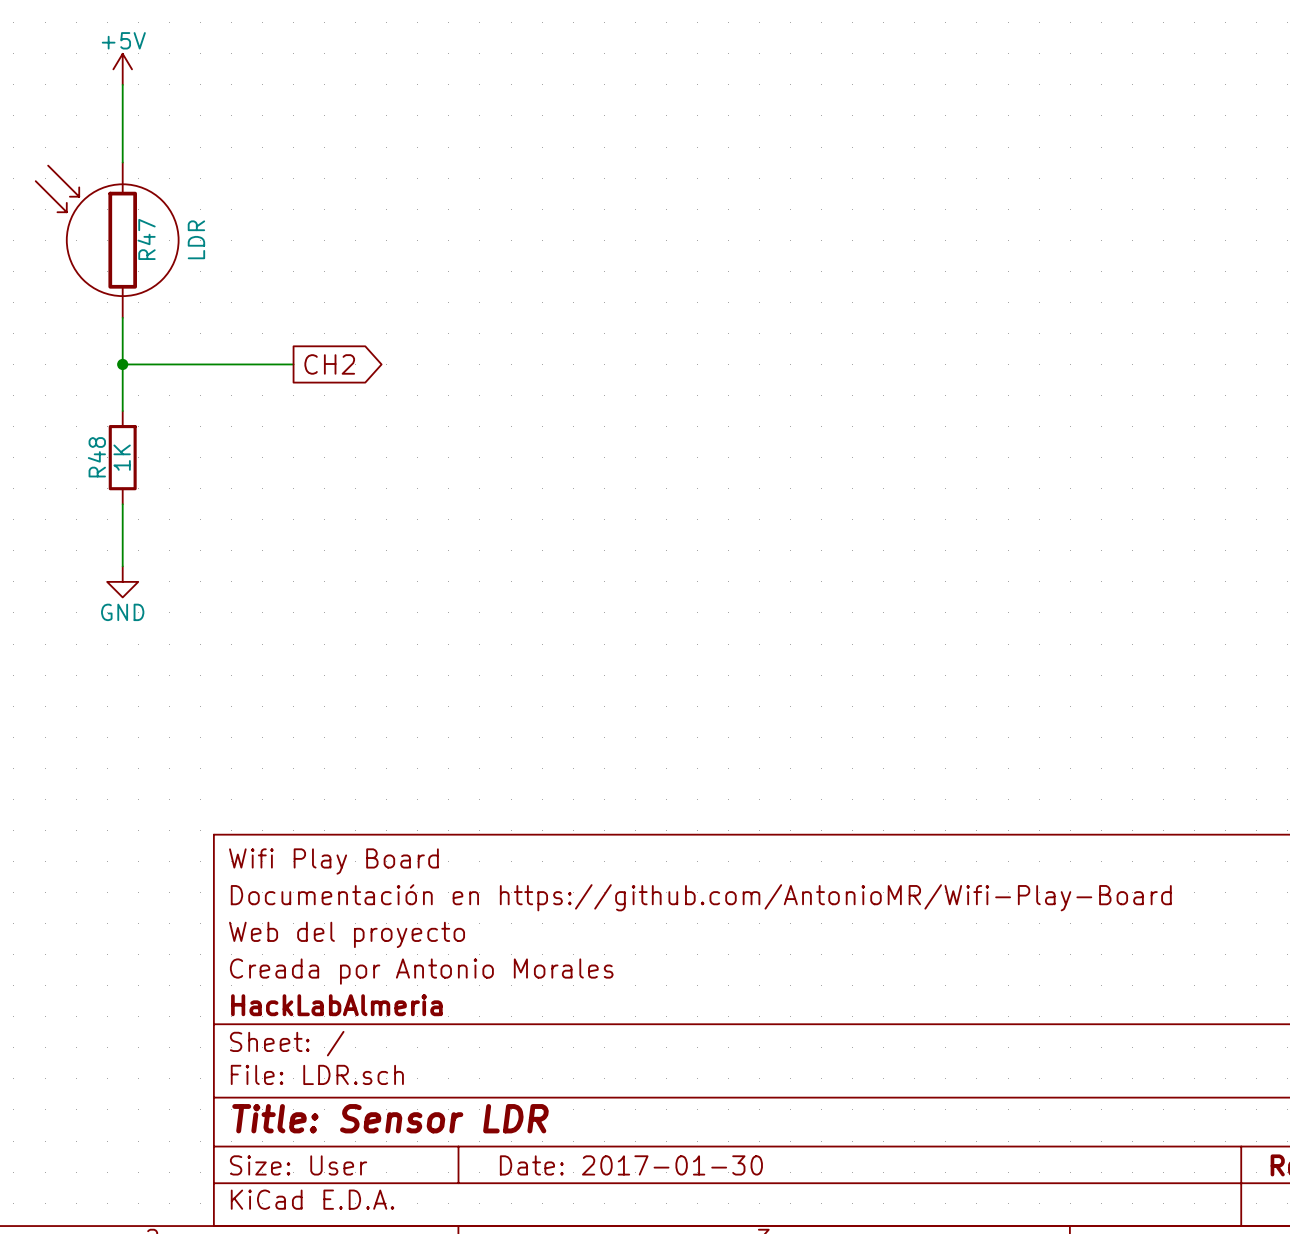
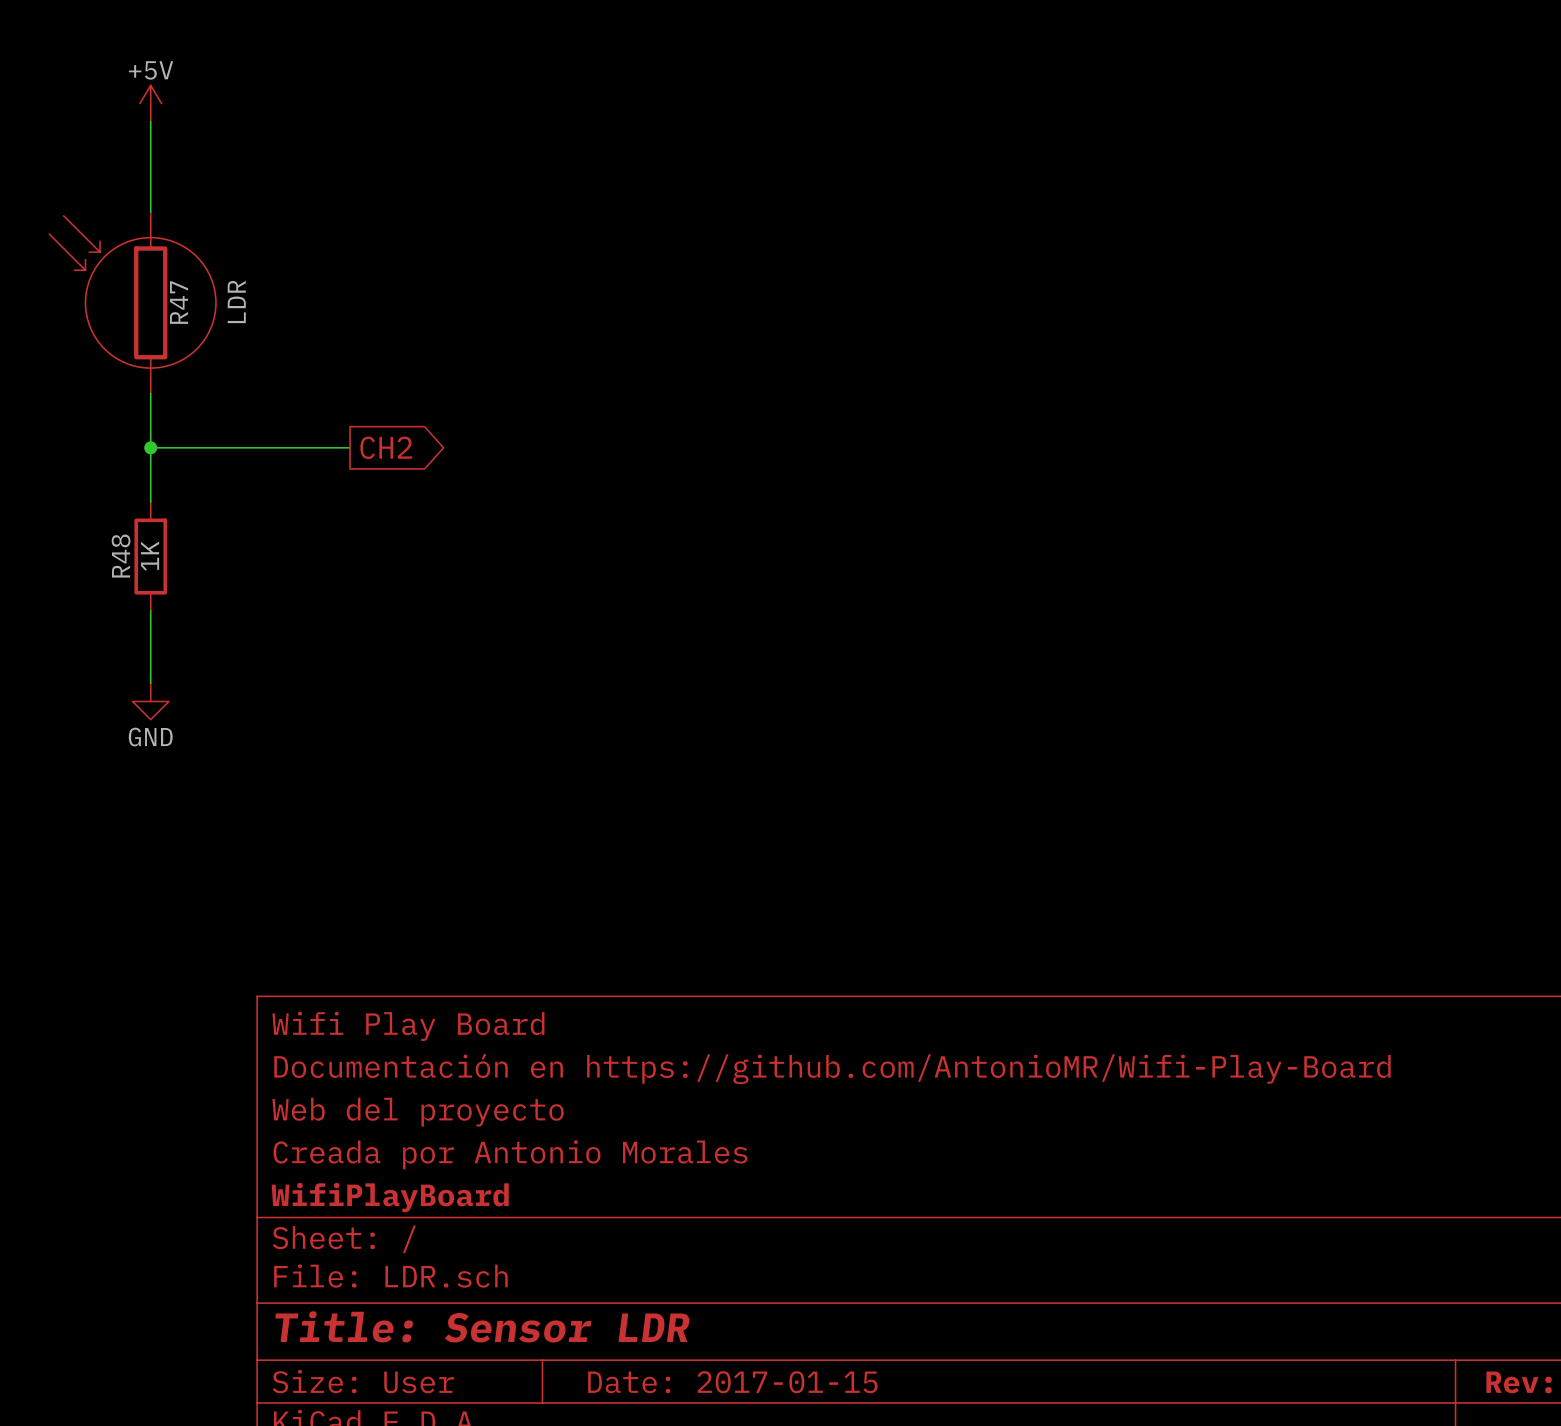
title block: HackLabAlmeria (336, 1005) -> WifiPlayBoard (390, 1197)
title block: Date: 2017-01-30 (631, 1165) -> Date: 2017-01-15 (732, 1382)

